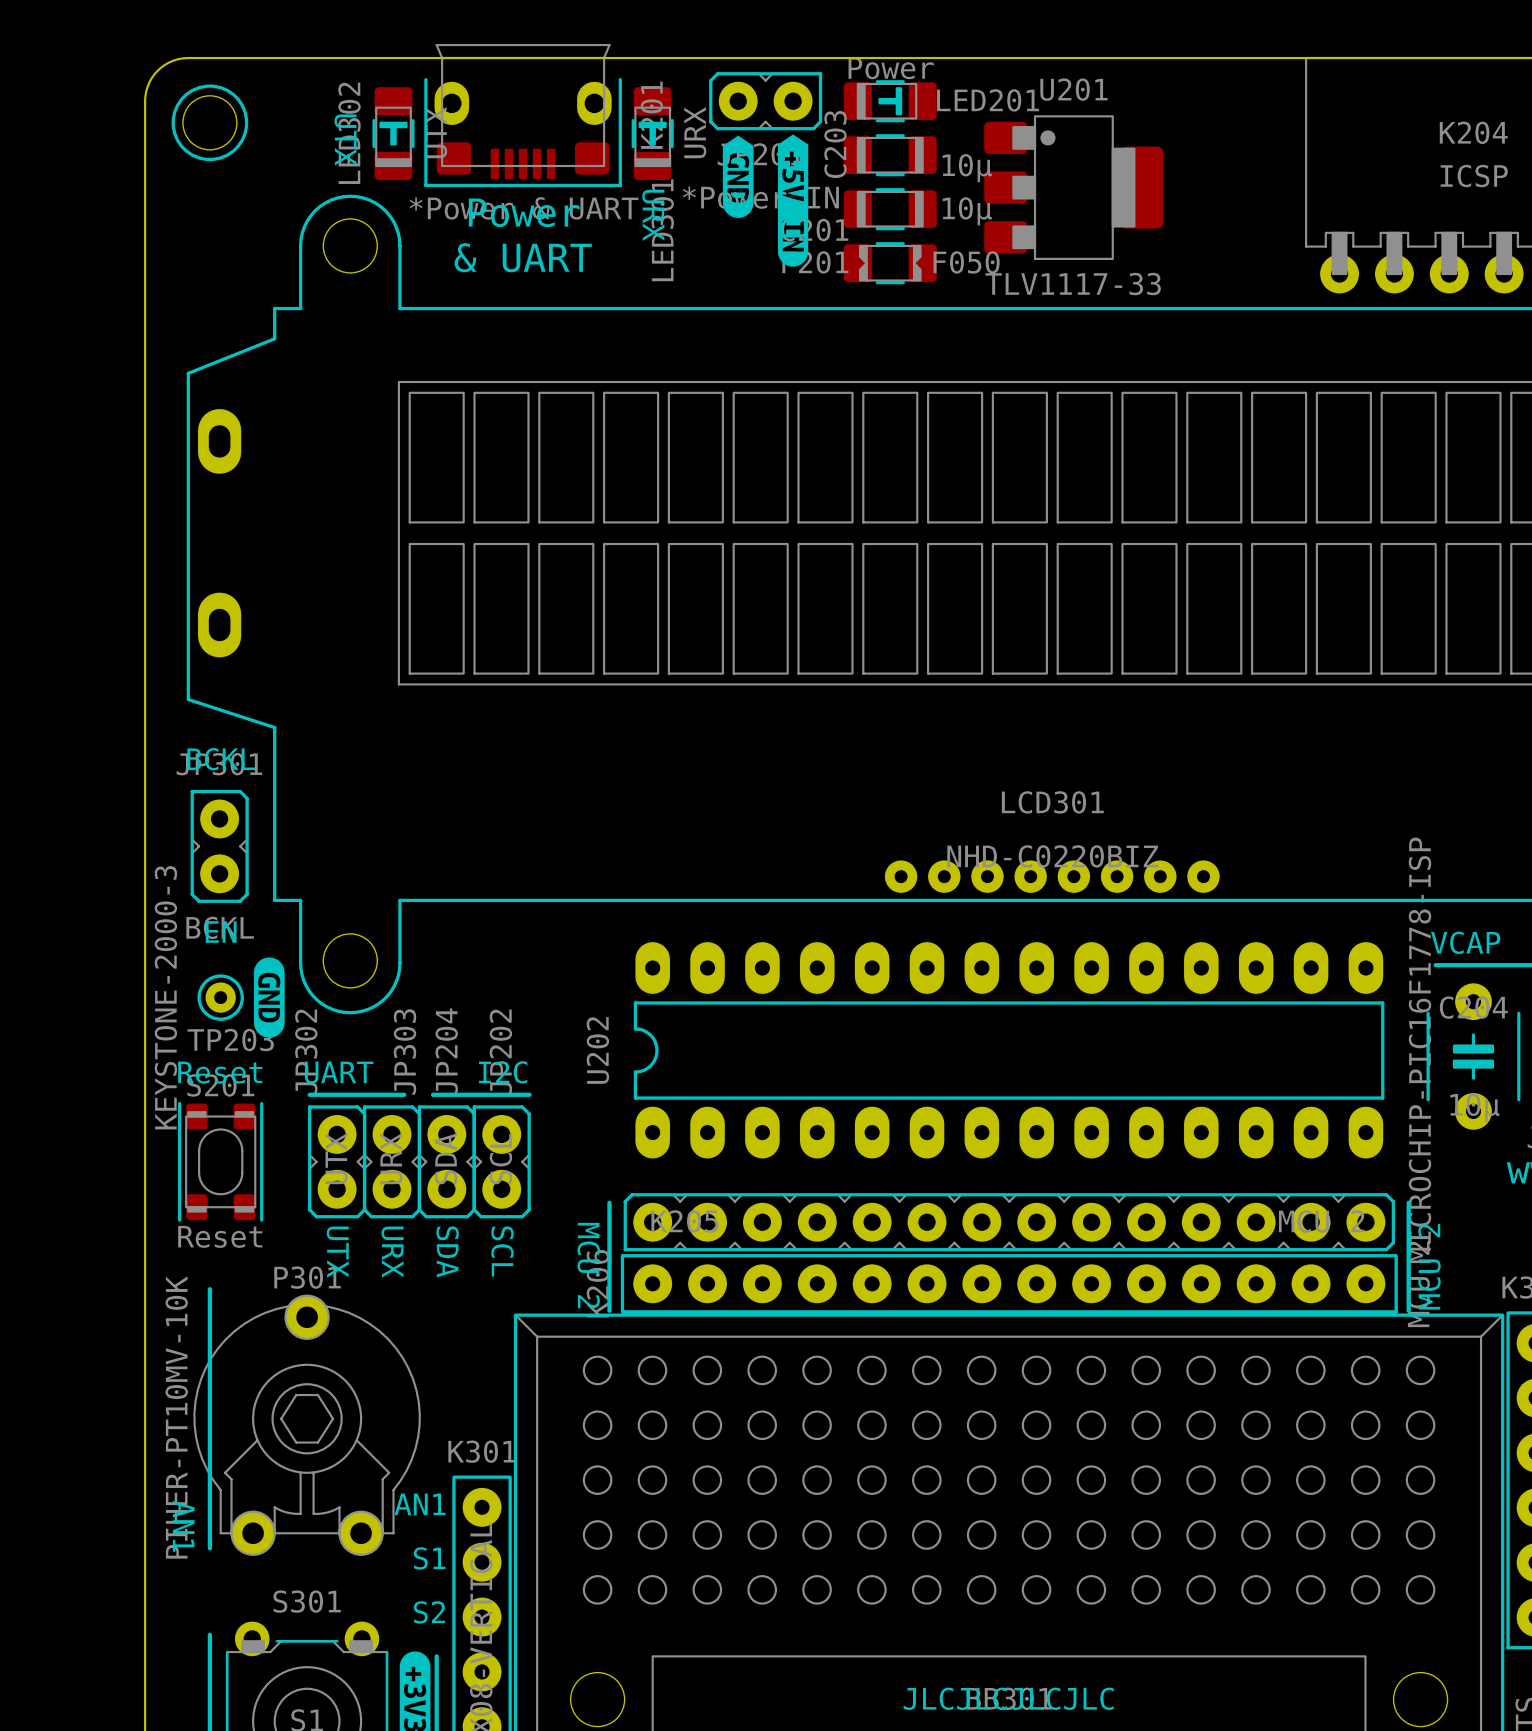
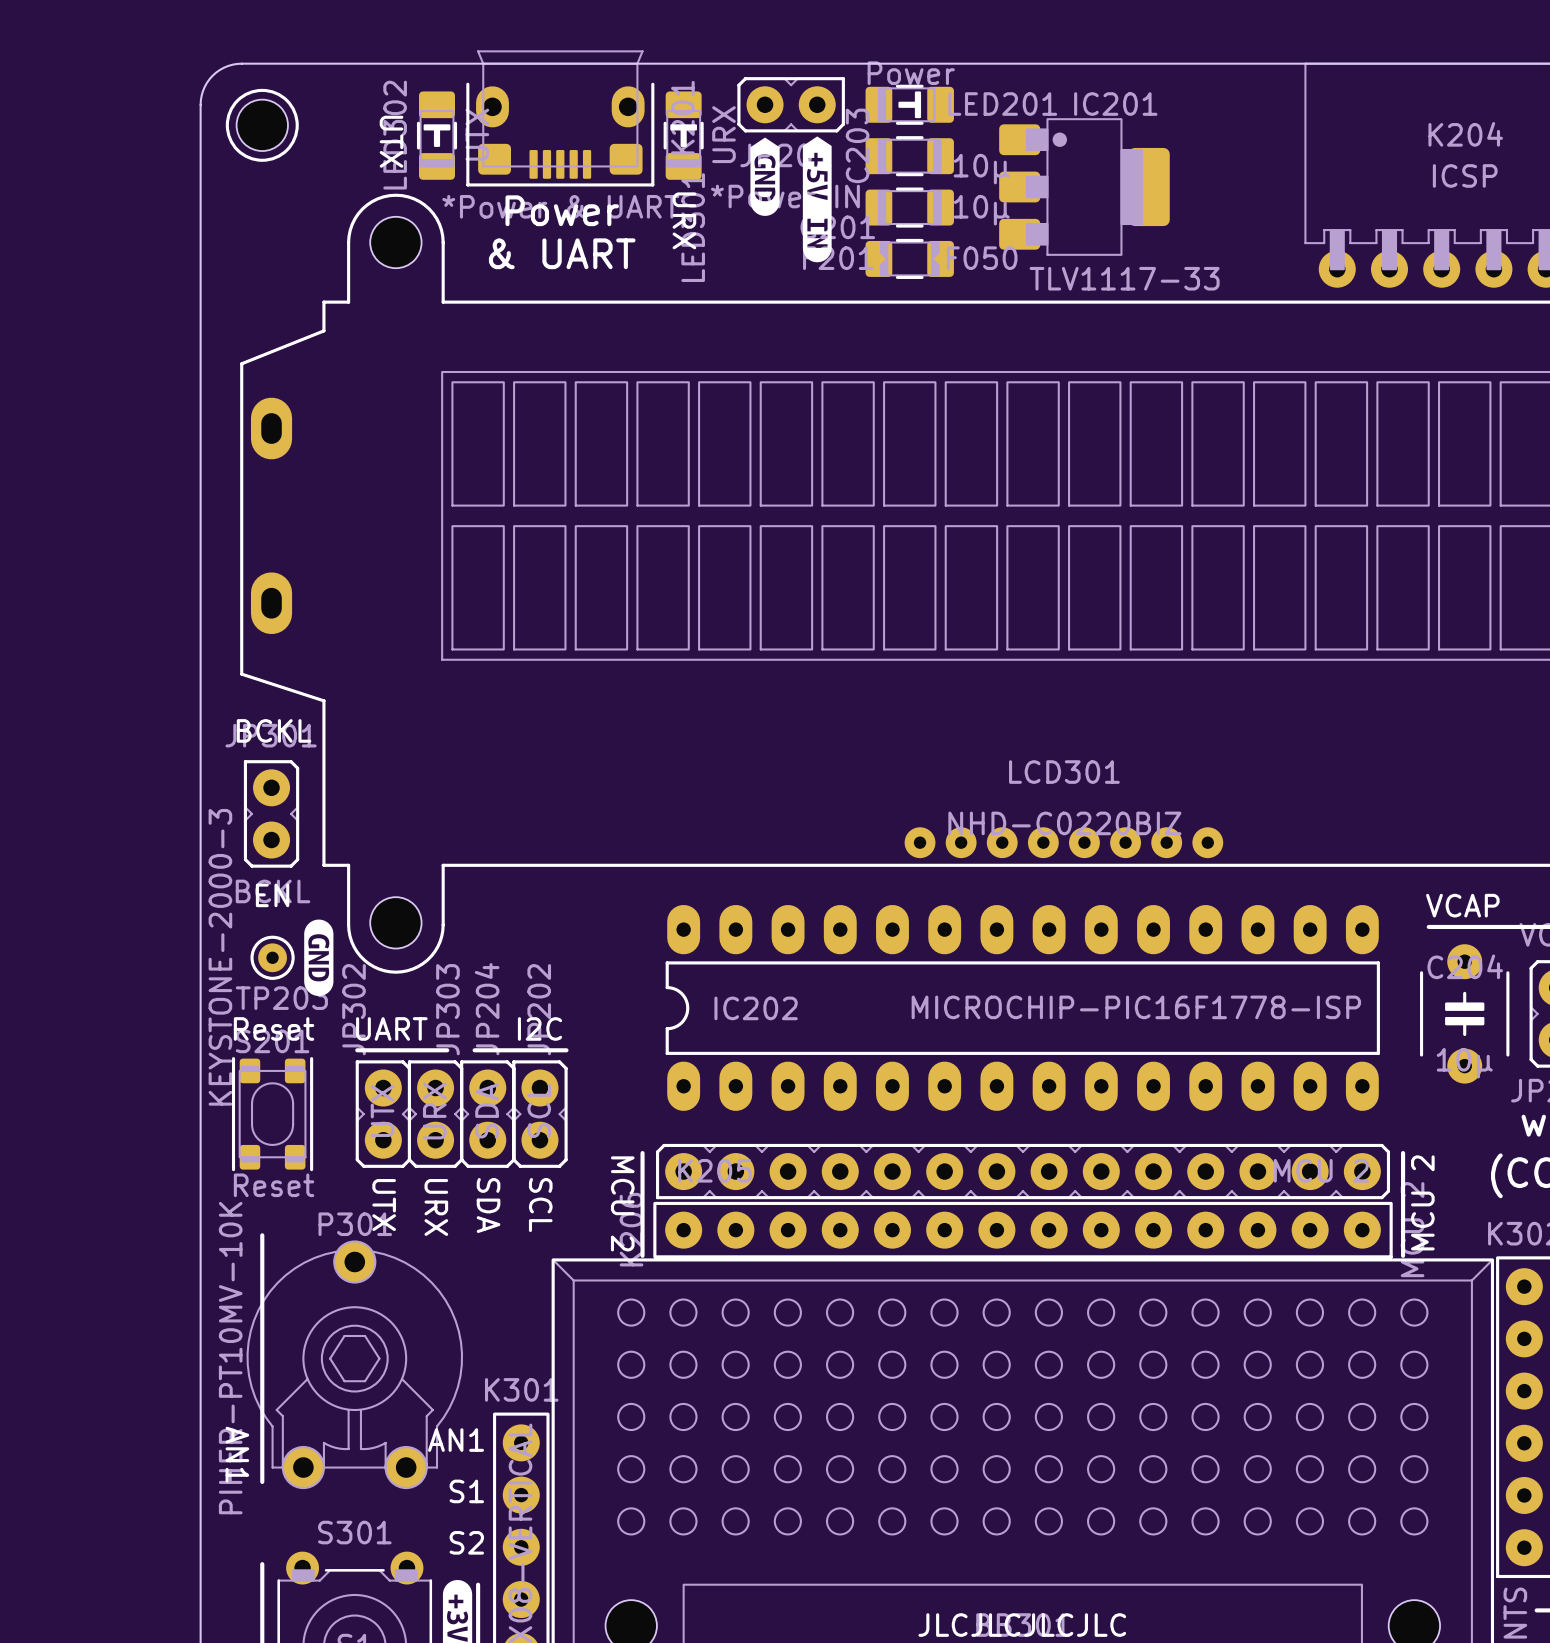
U201 name: U201 (1073, 89) -> IC201 (1115, 104)
U201 value position: TLV1117-33 (1073, 284) -> TLV1117-33 (1124, 278)
U202 name: U202 (597, 1050) -> IC202 (756, 1008)
U202 value rotation: 0° (1419, 1050) -> 90° clockwise (1136, 1007)

